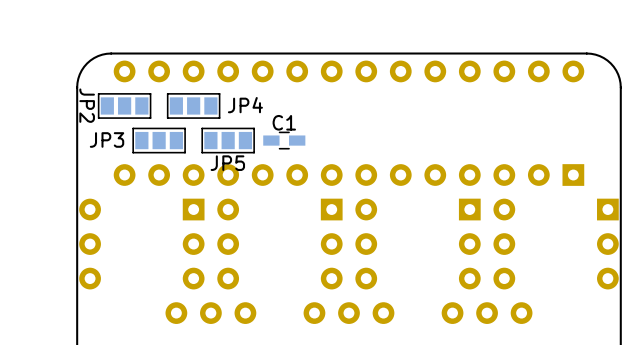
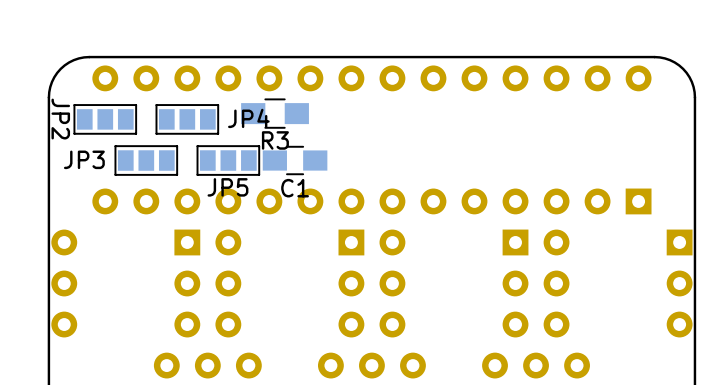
R3: none -> (275, 113)
C1 name position: C1 (284, 122) -> C1 (295, 188)
C1 footprint: [263, 131, 306, 150] -> [262, 145, 328, 176]

